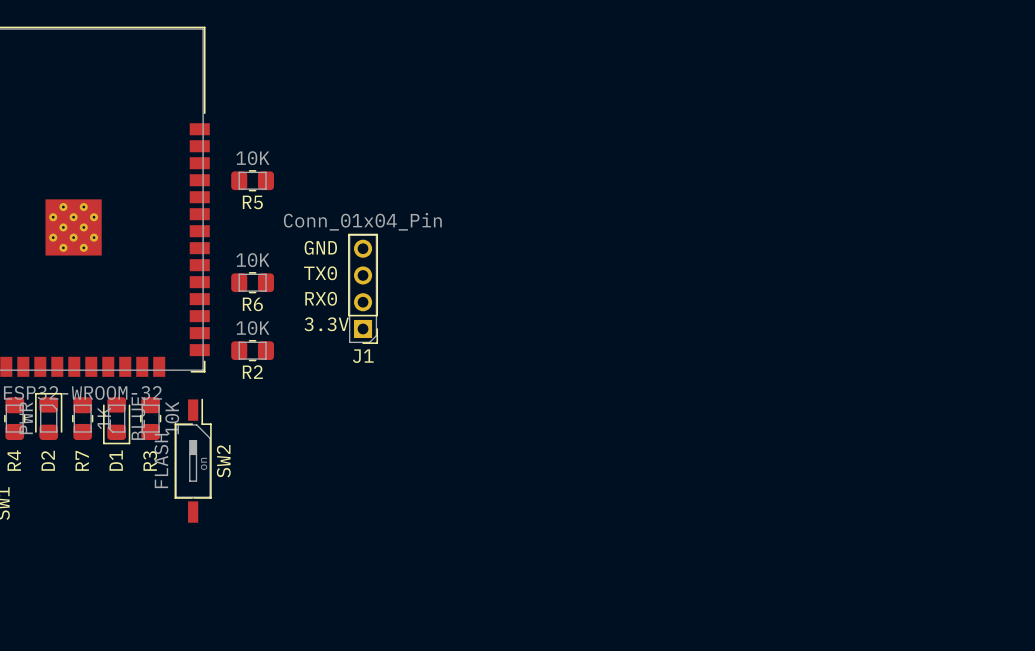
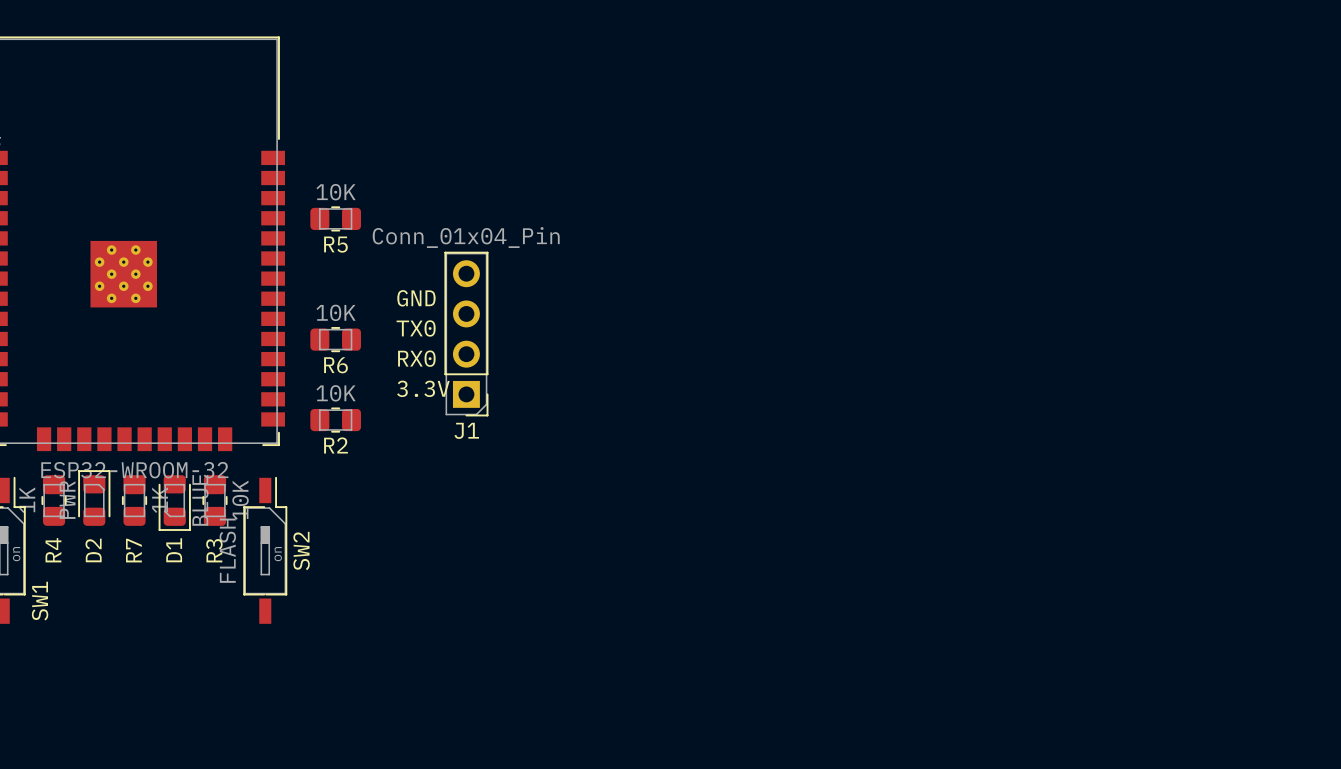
J1 footprint: [348, 233, 379, 344] -> [444, 251, 489, 417]

